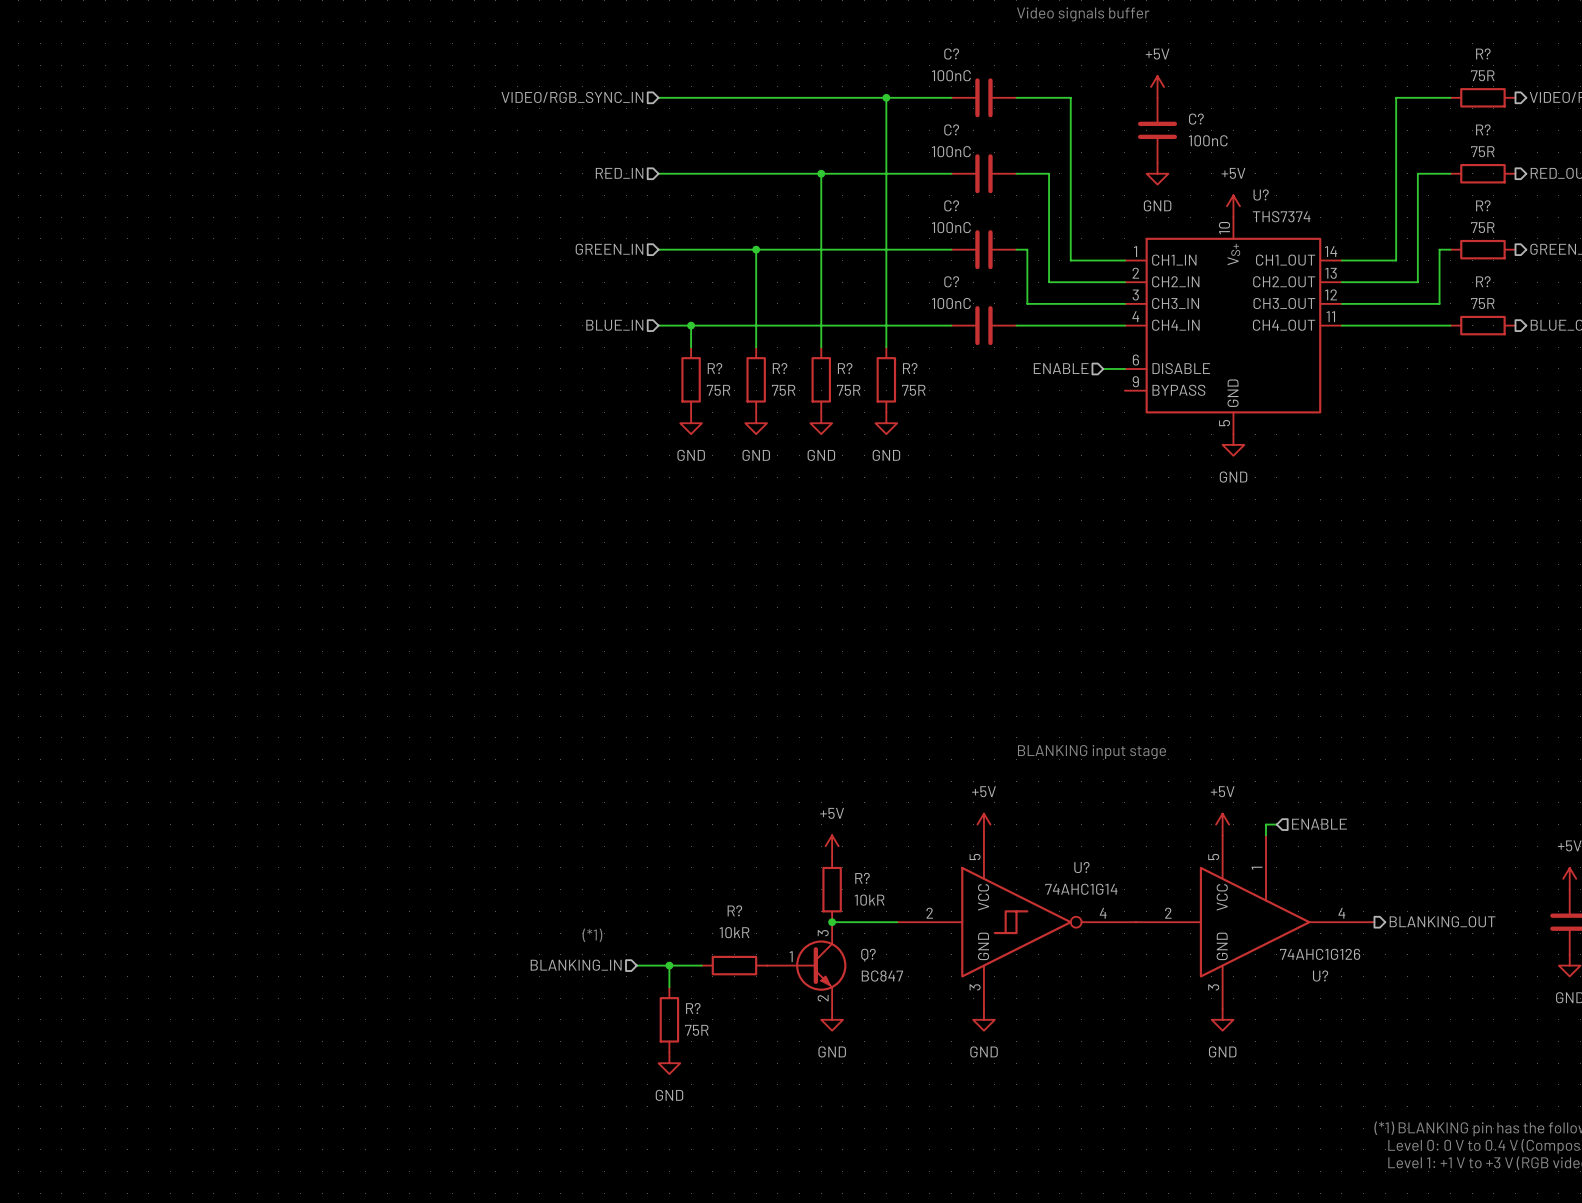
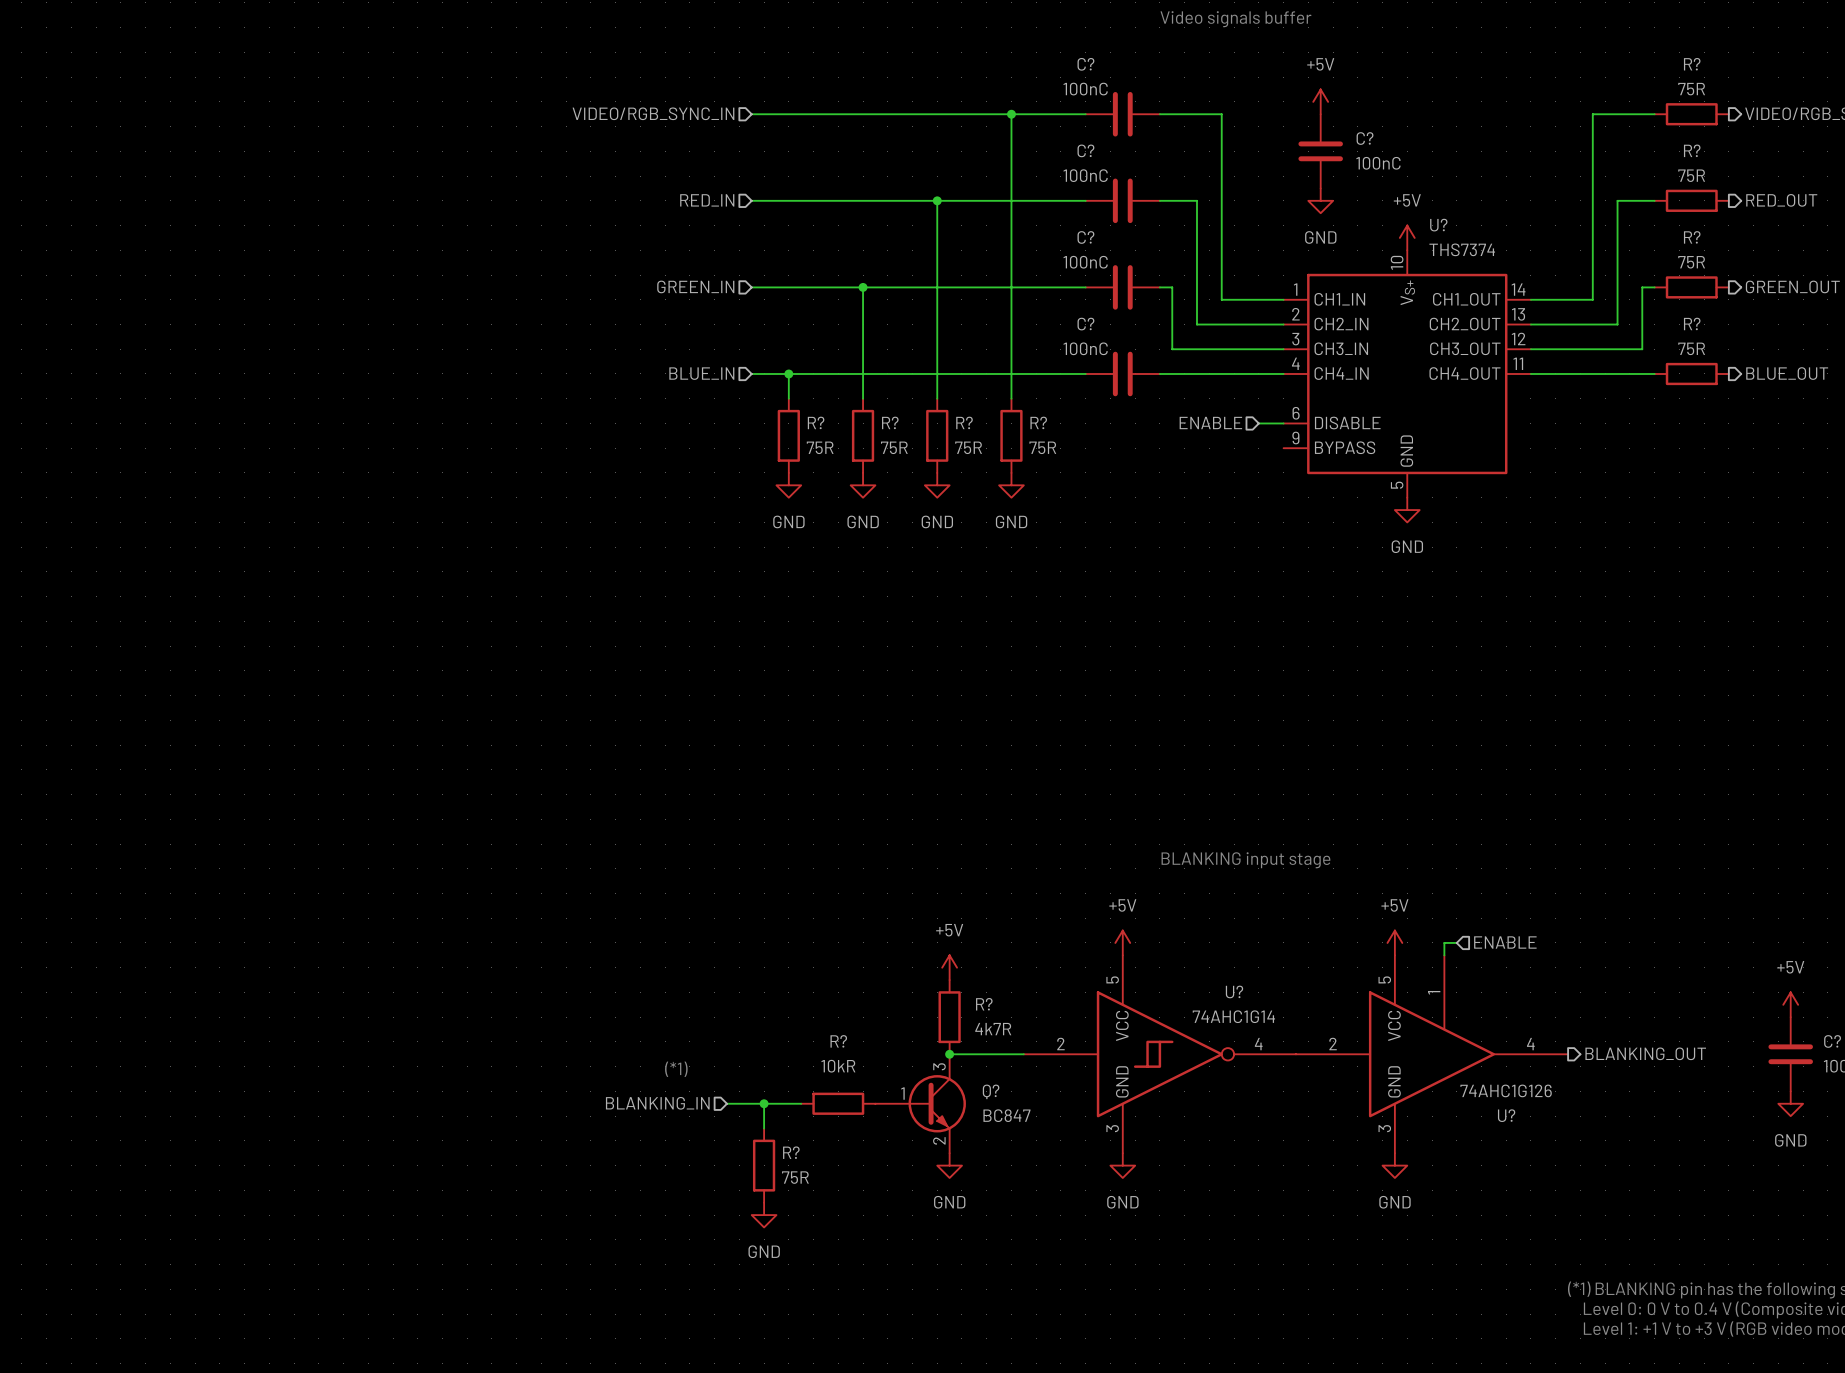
R? value: 10kR (869, 900) -> 4k7R (993, 1029)

